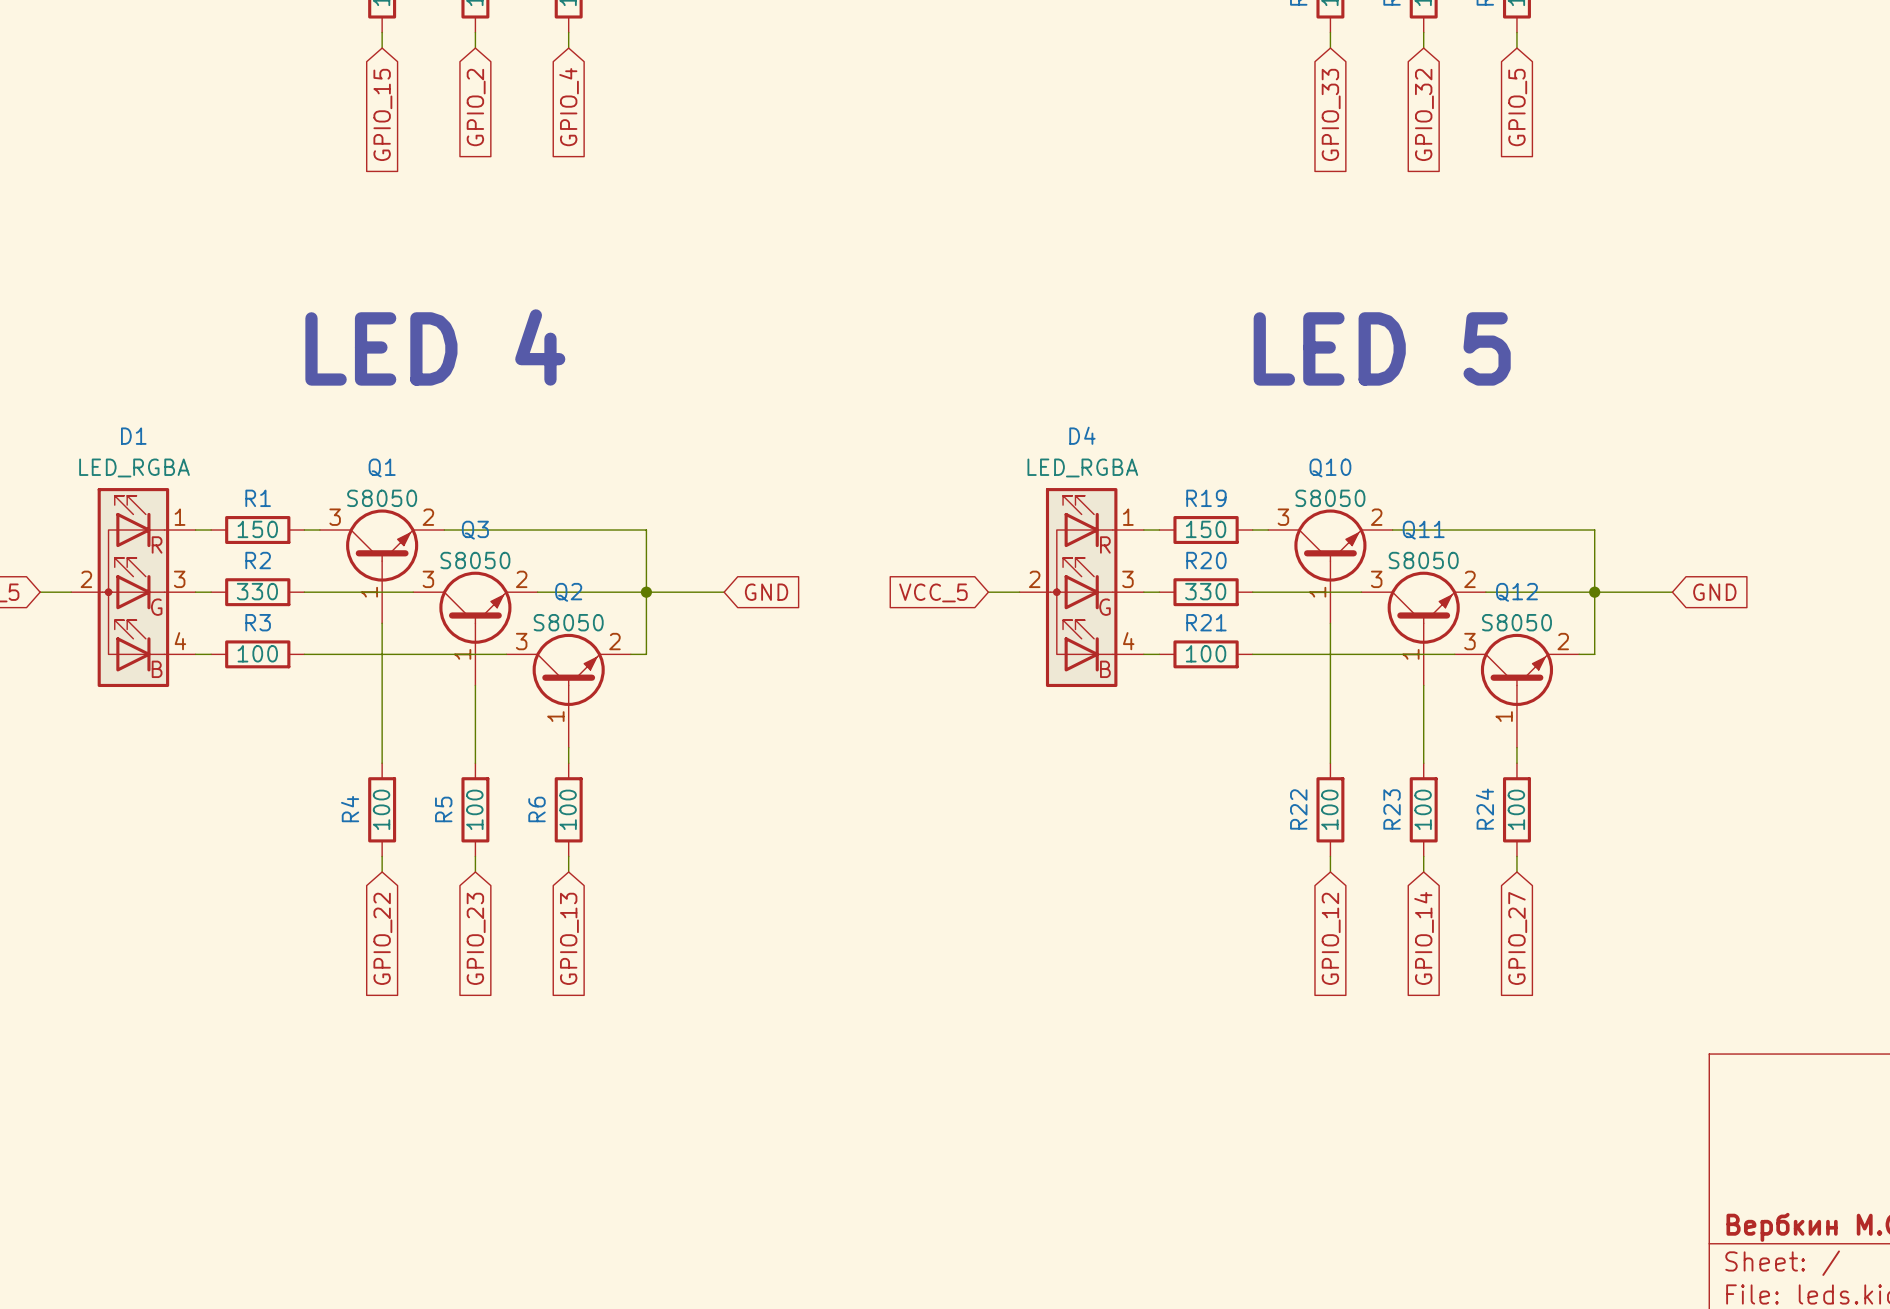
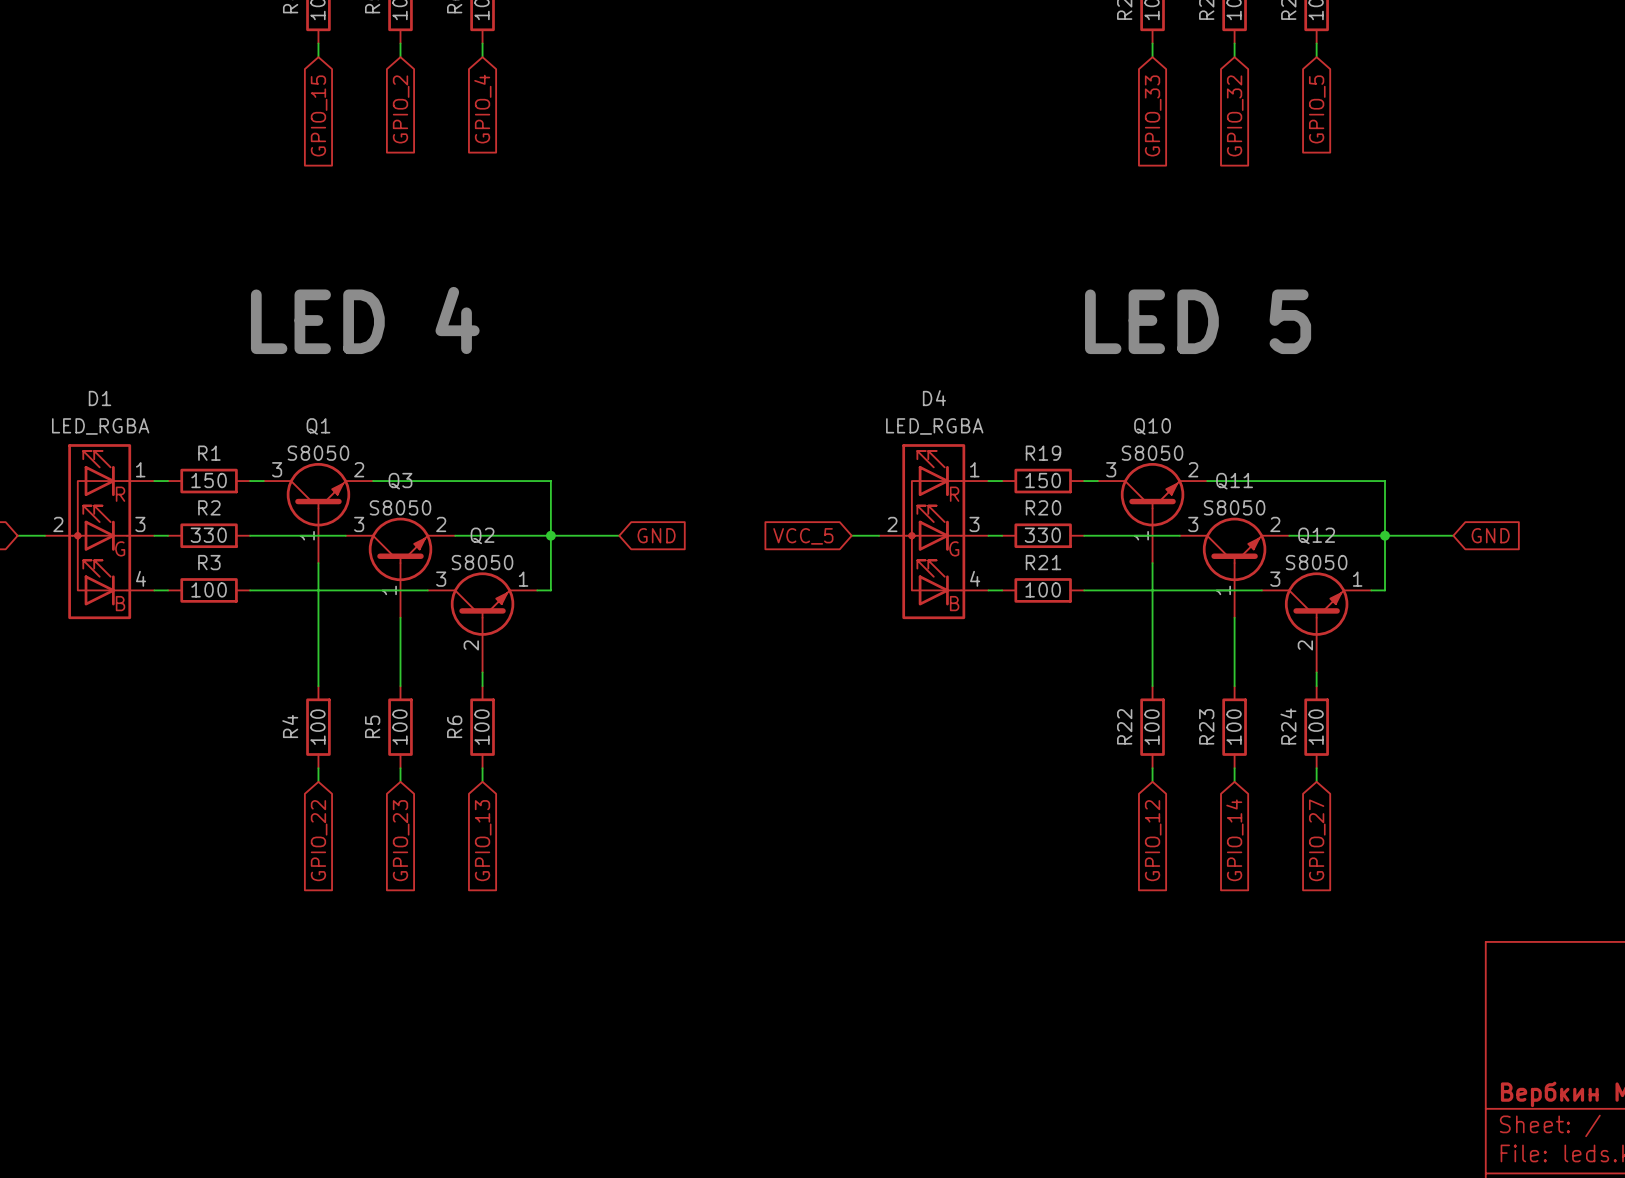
Q2 pin number: 2 (614, 641) -> 1 (523, 579)
Q12 pin number: 2 (1563, 641) -> 1 (1357, 579)
Q2 pin number: 1 (555, 716) -> 2 (471, 645)
Q12 pin number: 1 (1504, 716) -> 2 (1305, 645)

